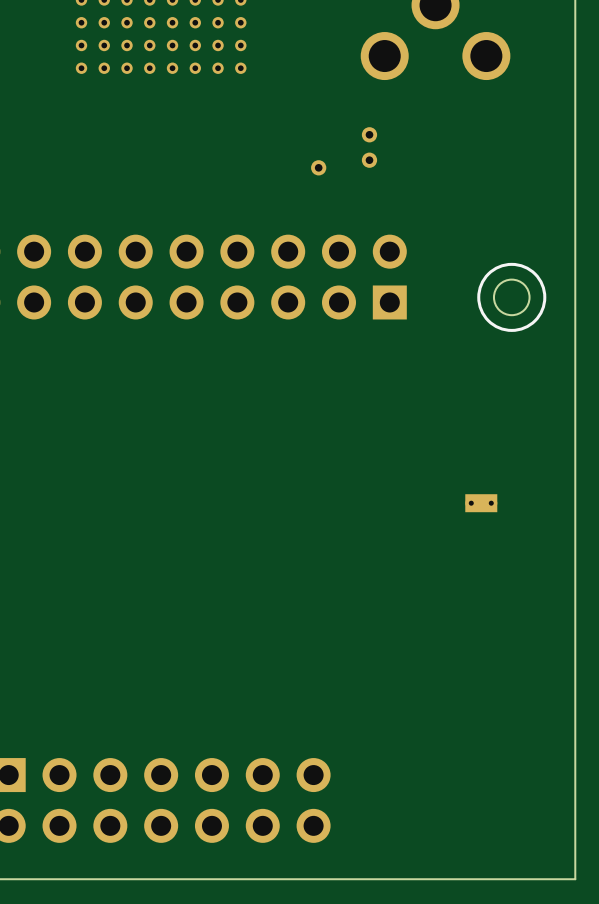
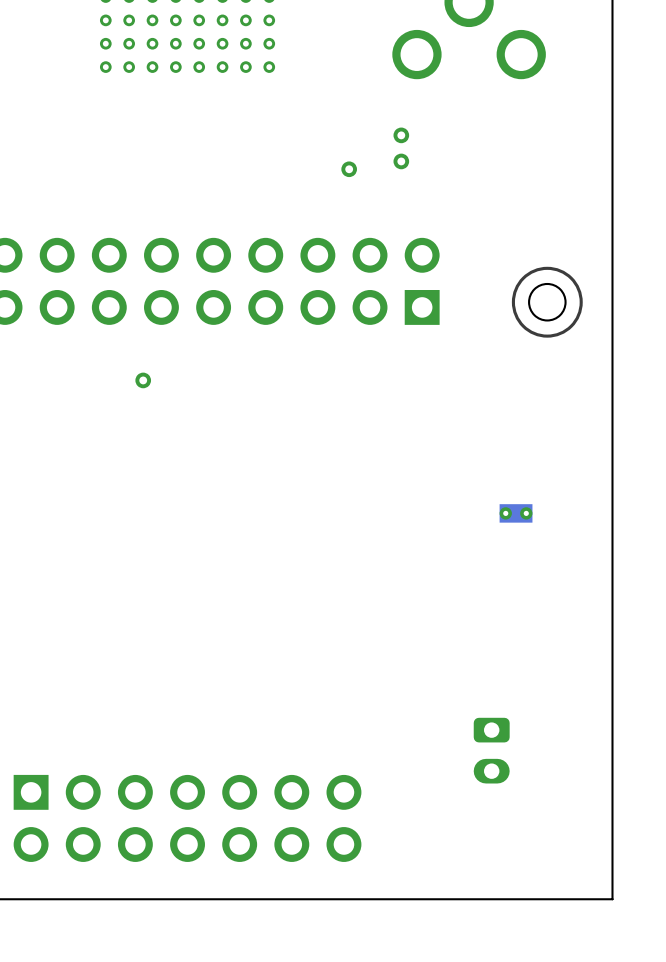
part: none -> (143, 380)
part: none -> (491, 750)

